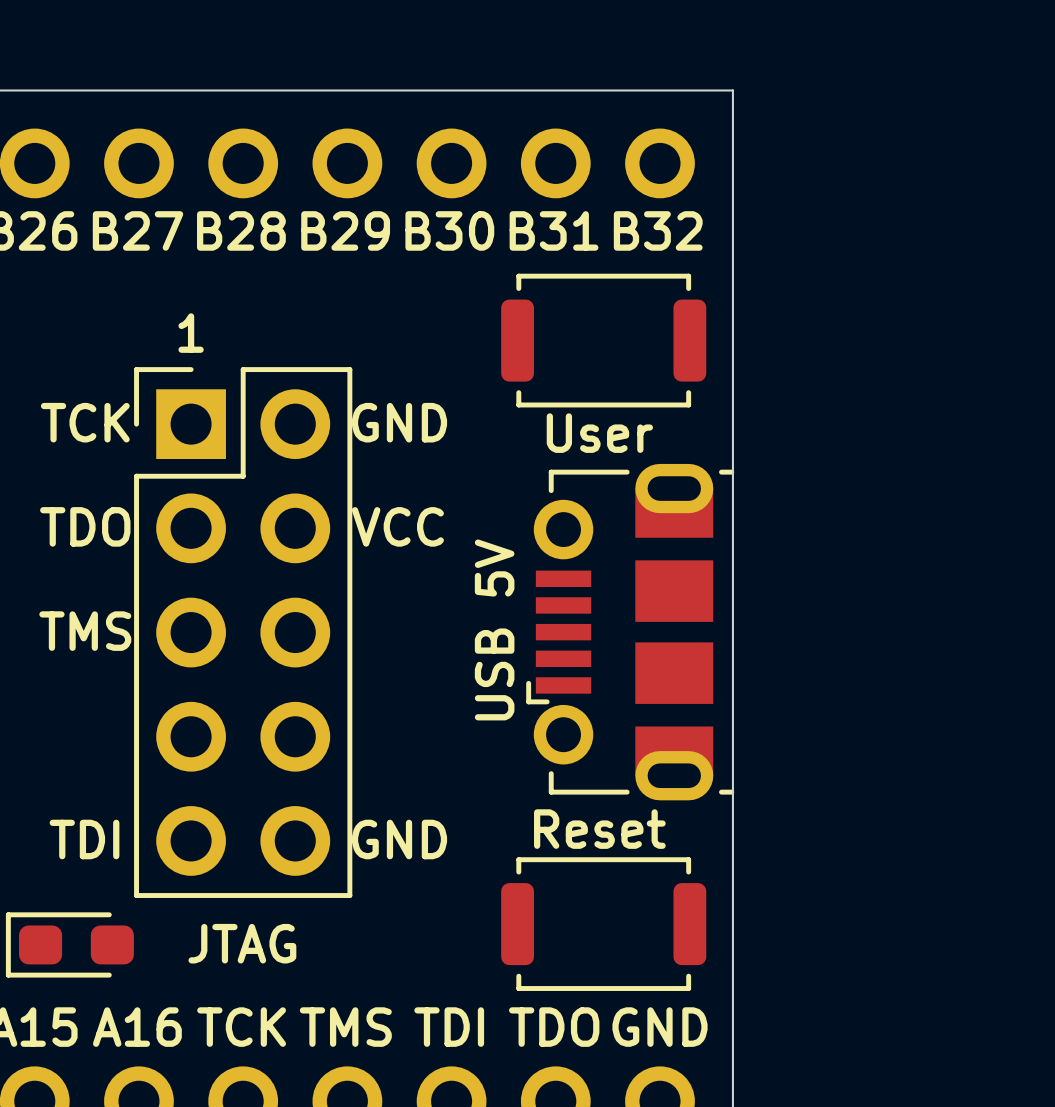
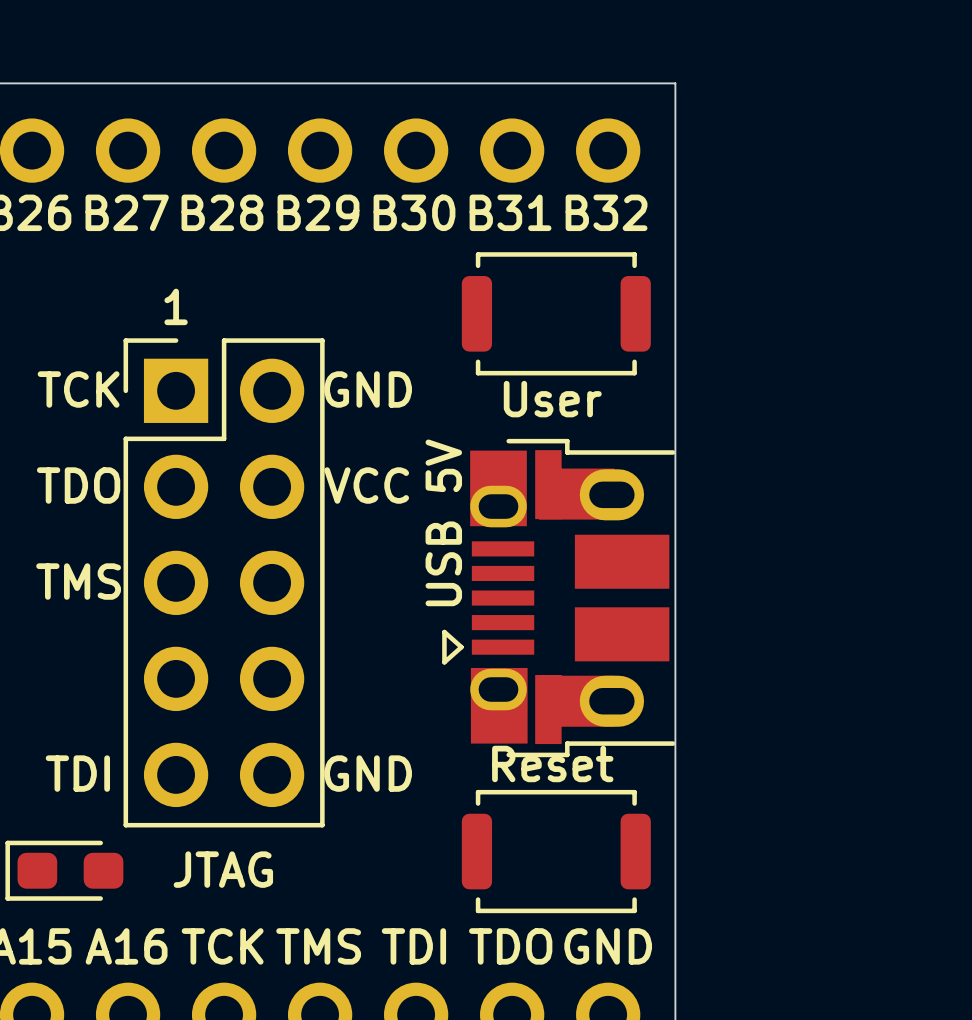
part footprint: [526, 463, 735, 801] -> [442, 438, 676, 758]
text position: USB 5V (494, 629) -> USB 5V (443, 522)

